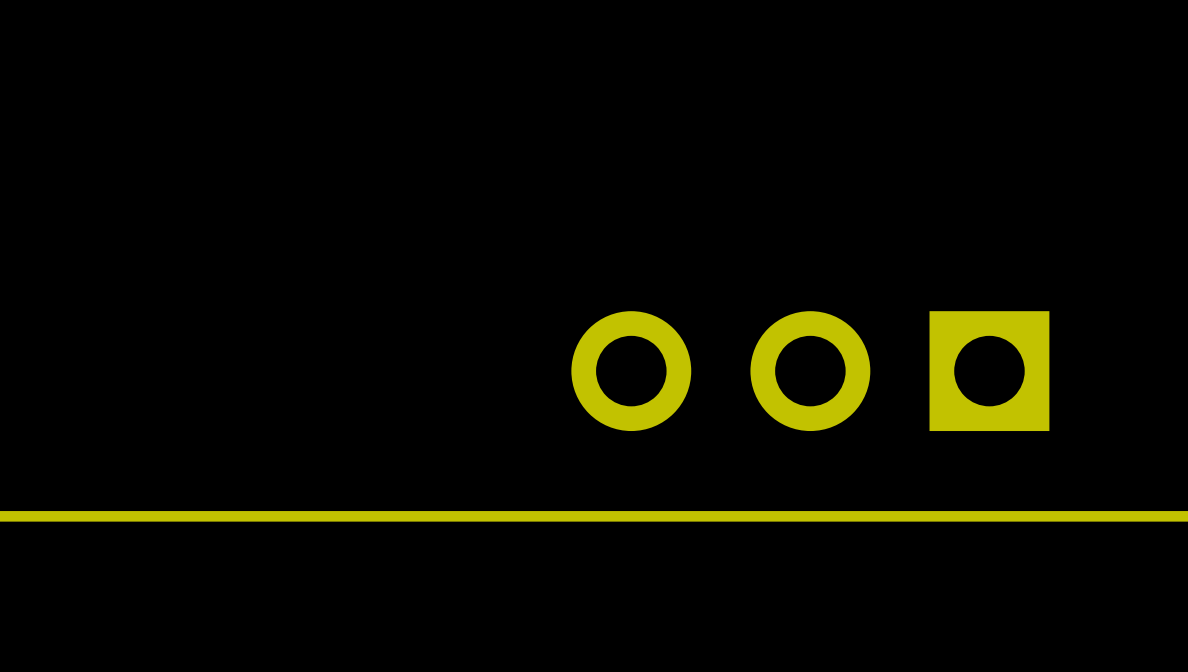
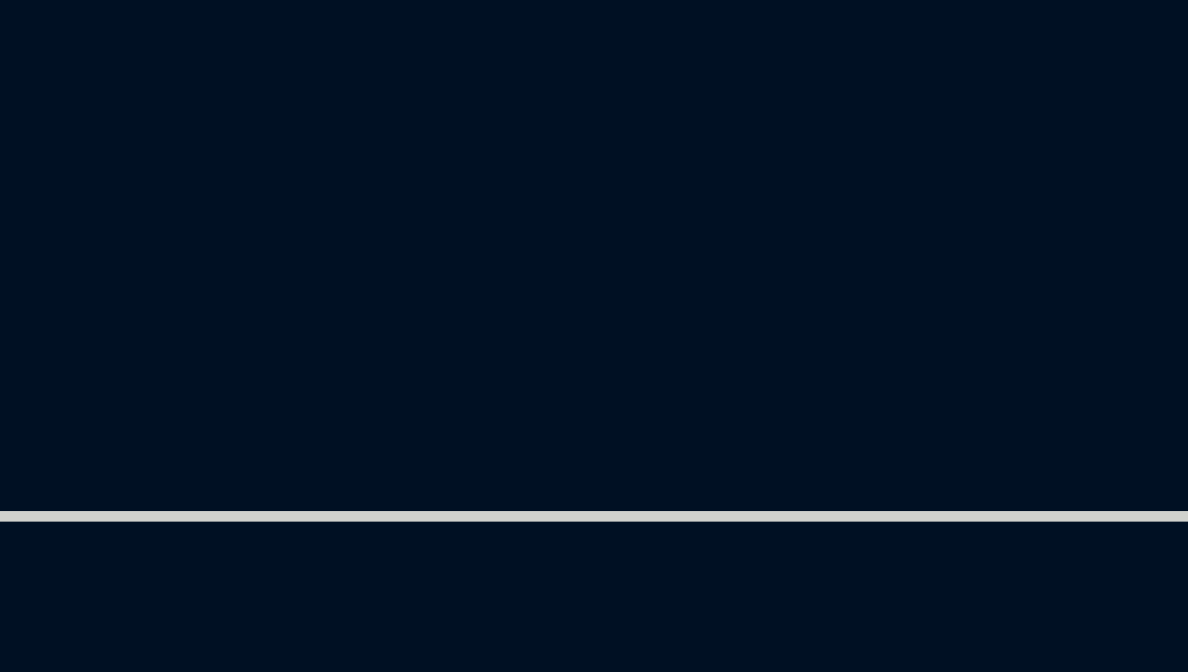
part: (810, 371) -> none

